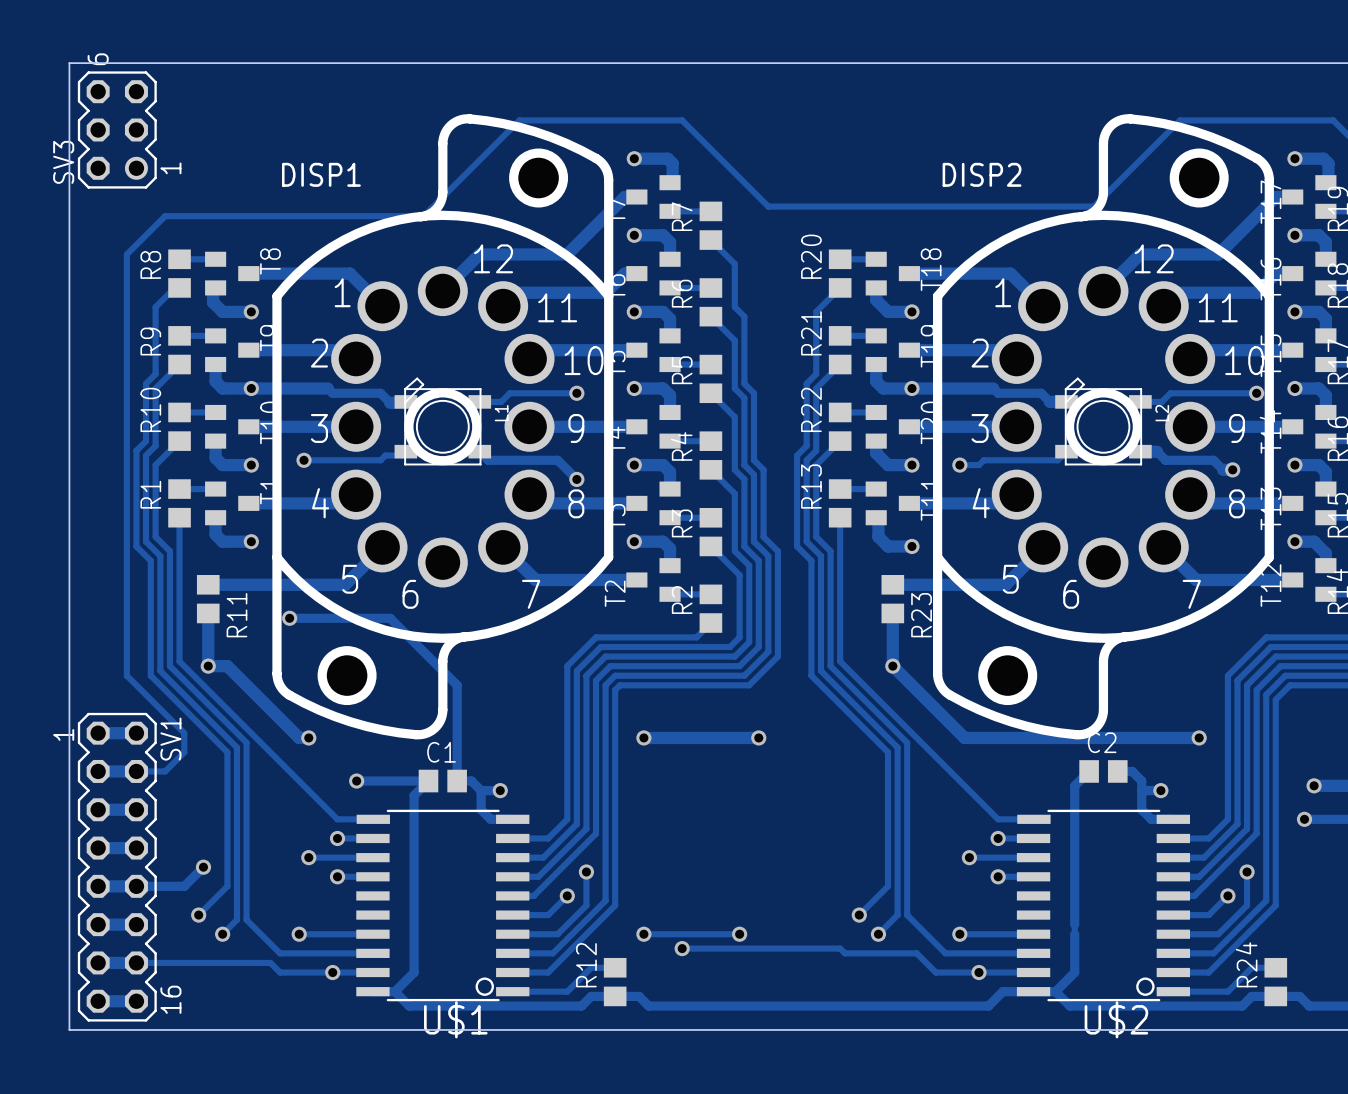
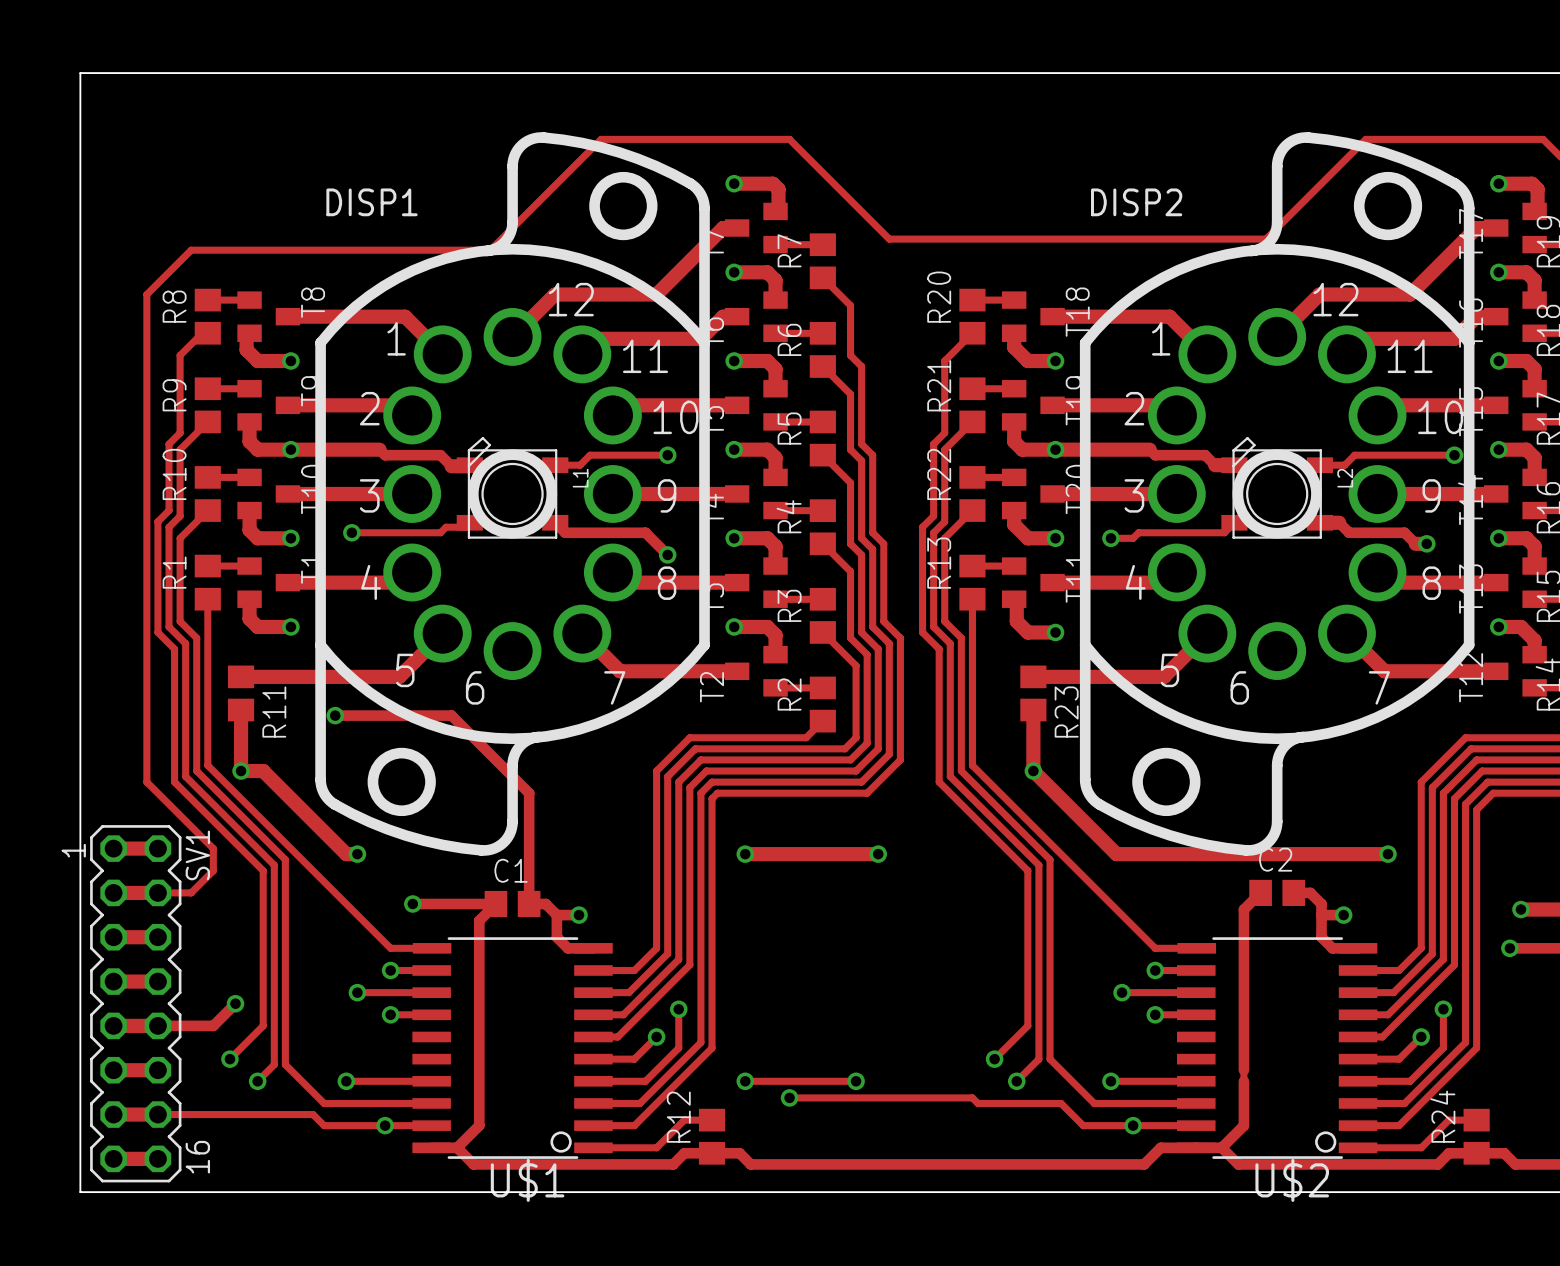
SV3: (117, 129) -> none

